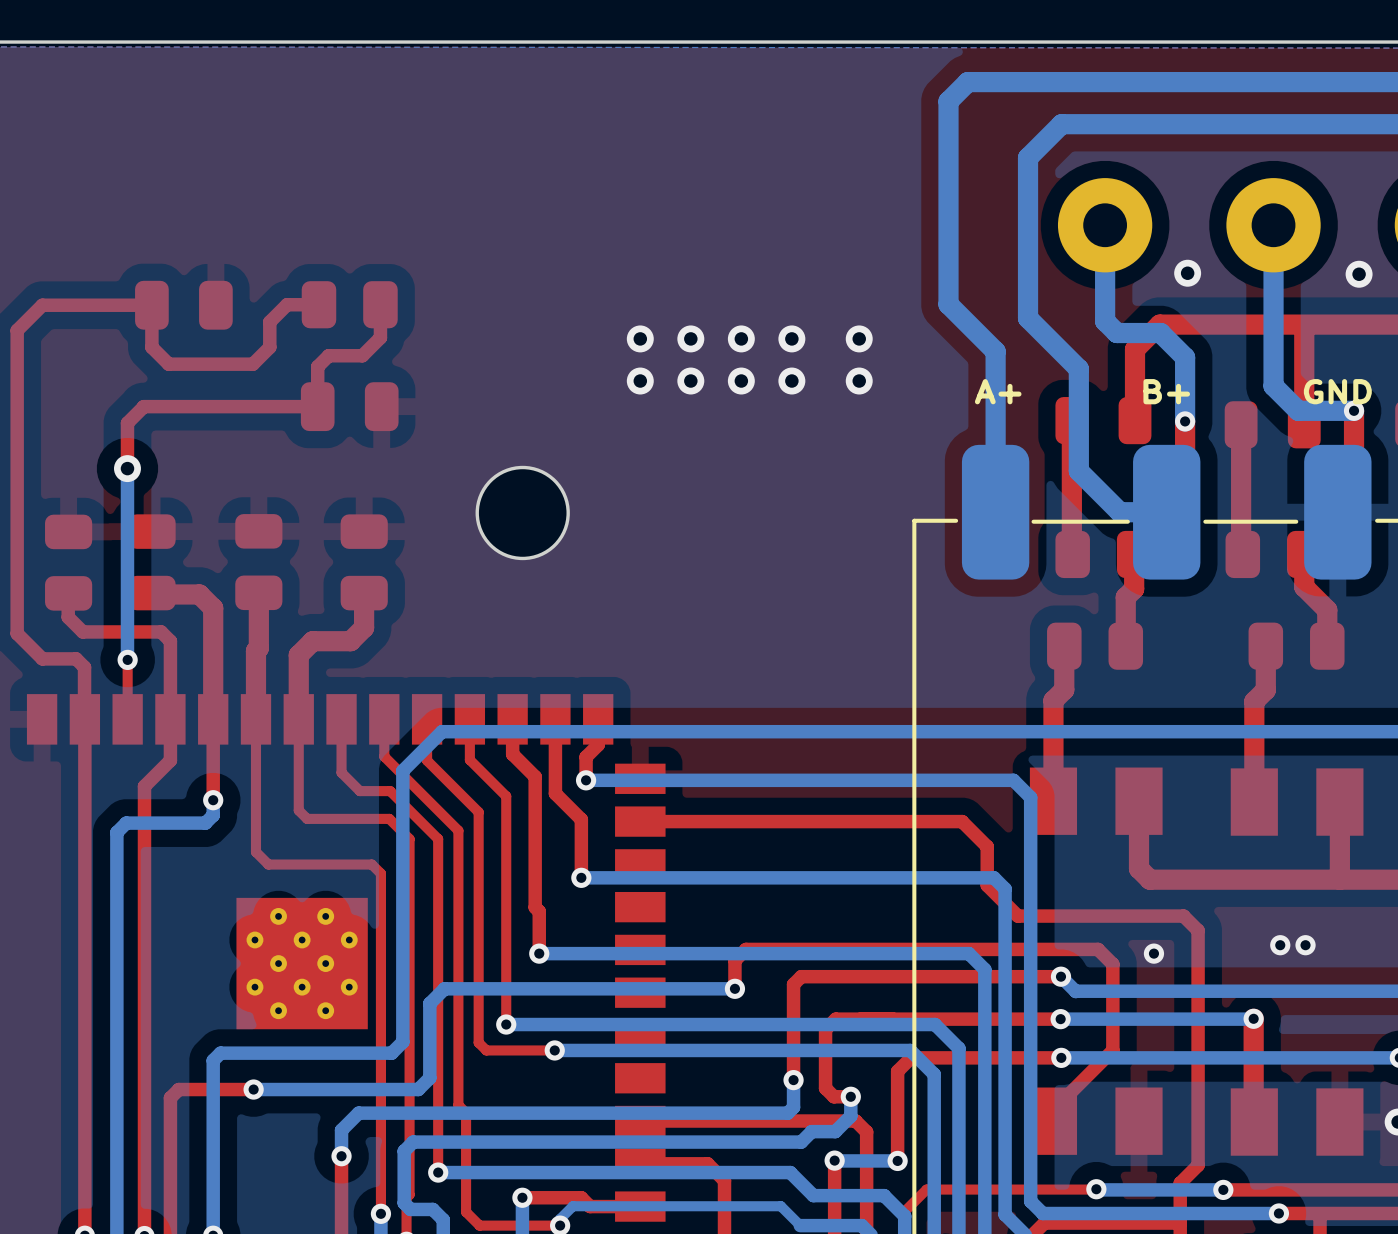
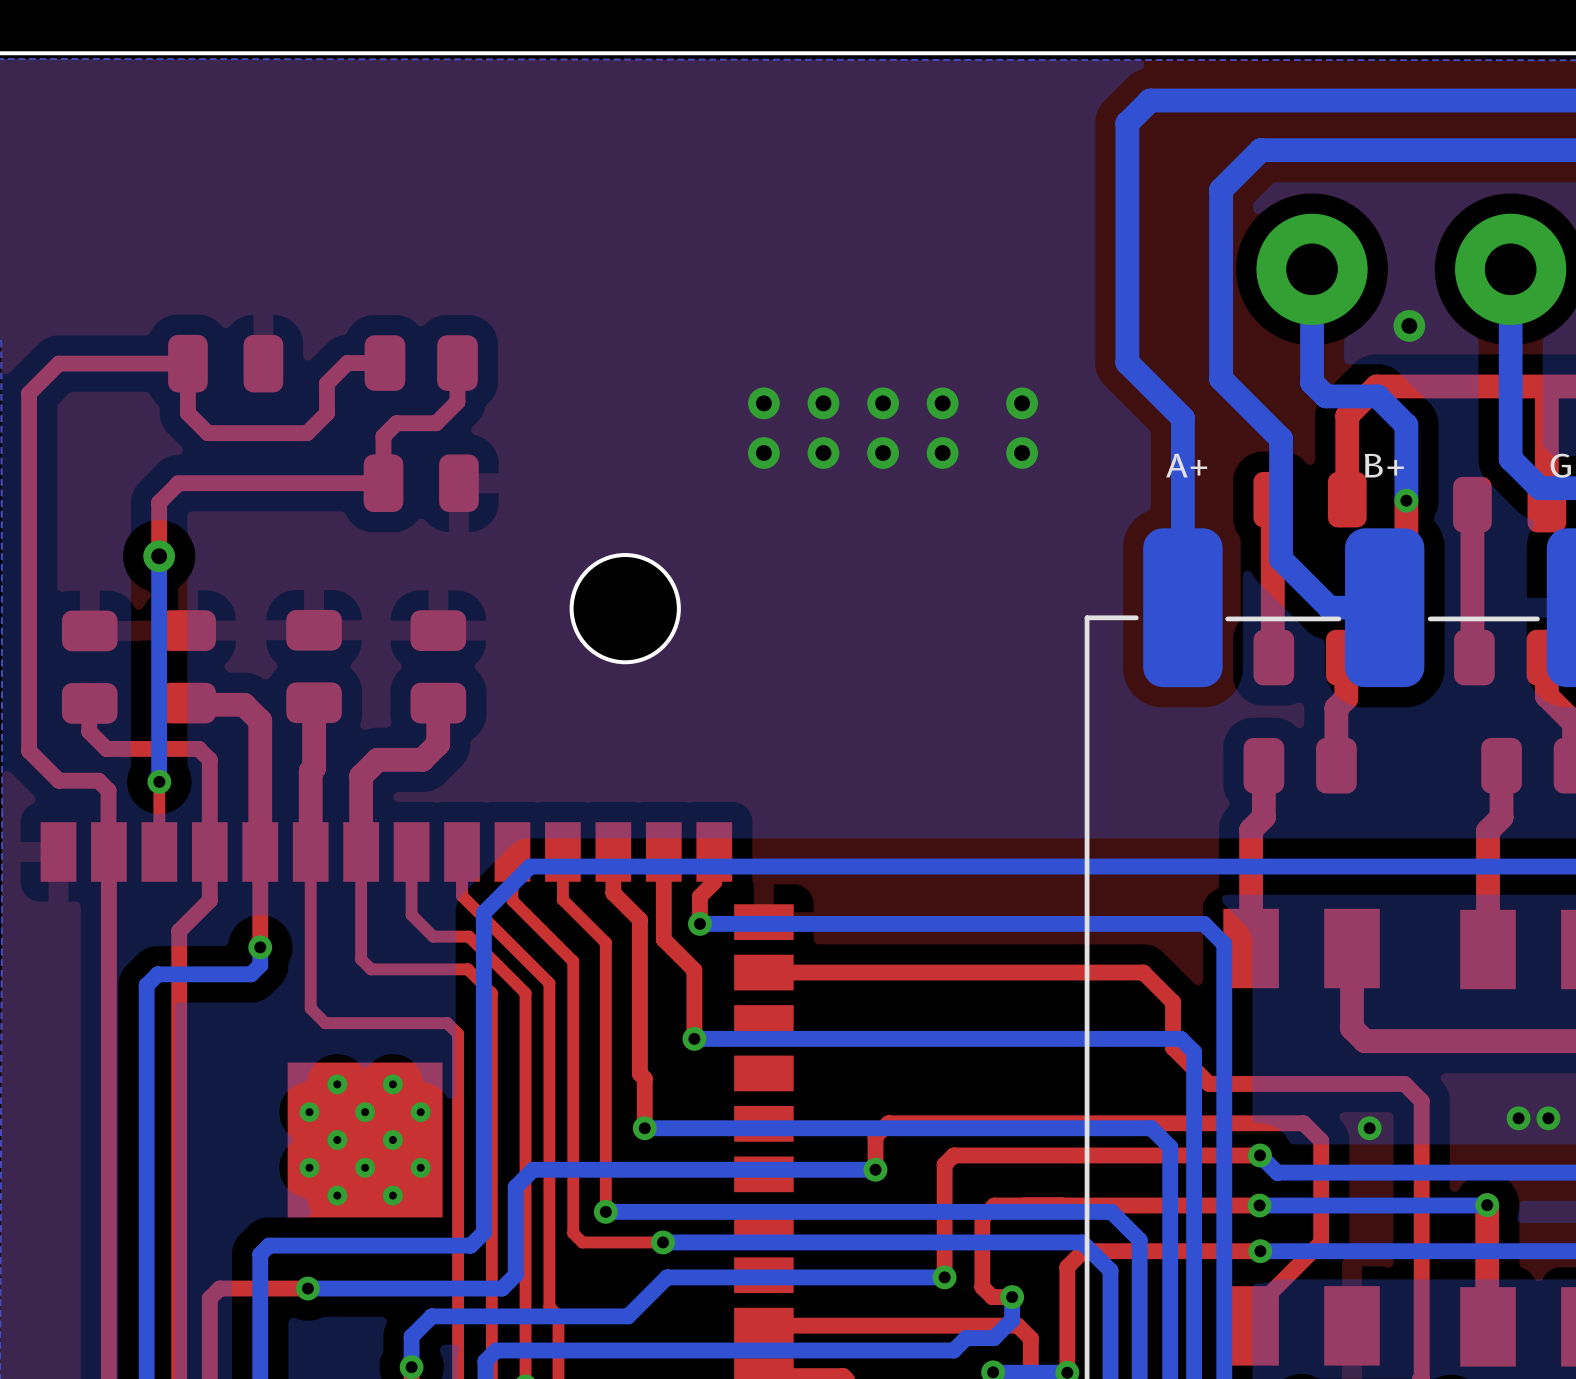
bottom track: (793, 1080) (793, 1107) (787, 1113) (525, 1113) -> (944, 1277) (667, 1277) (628, 1316)

